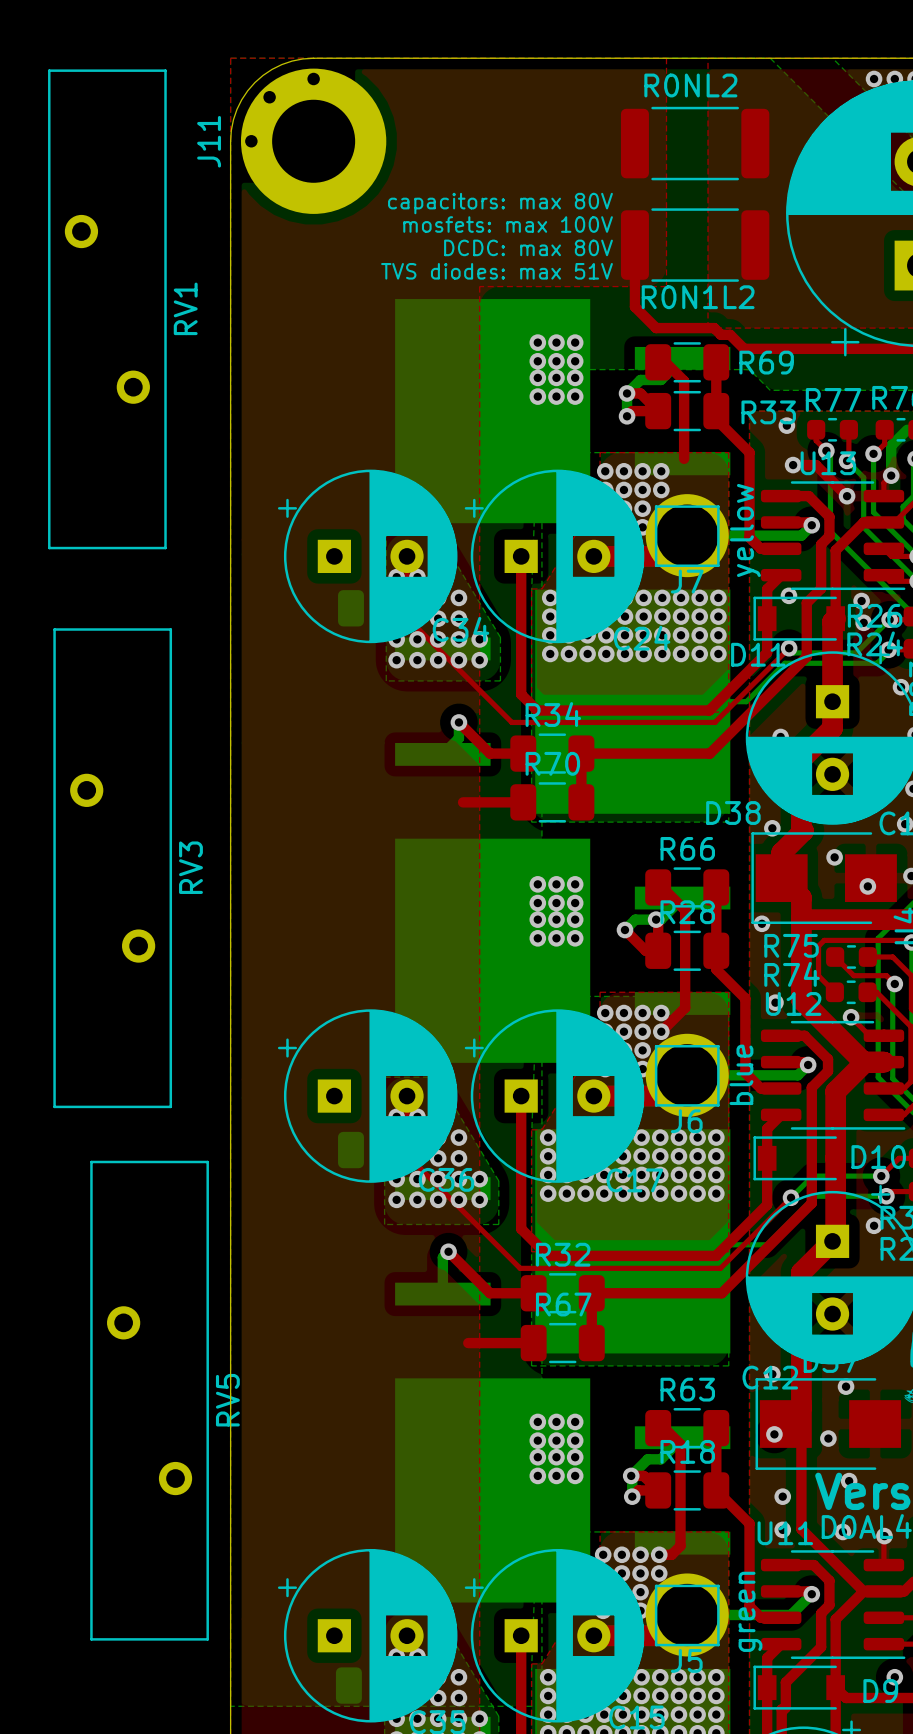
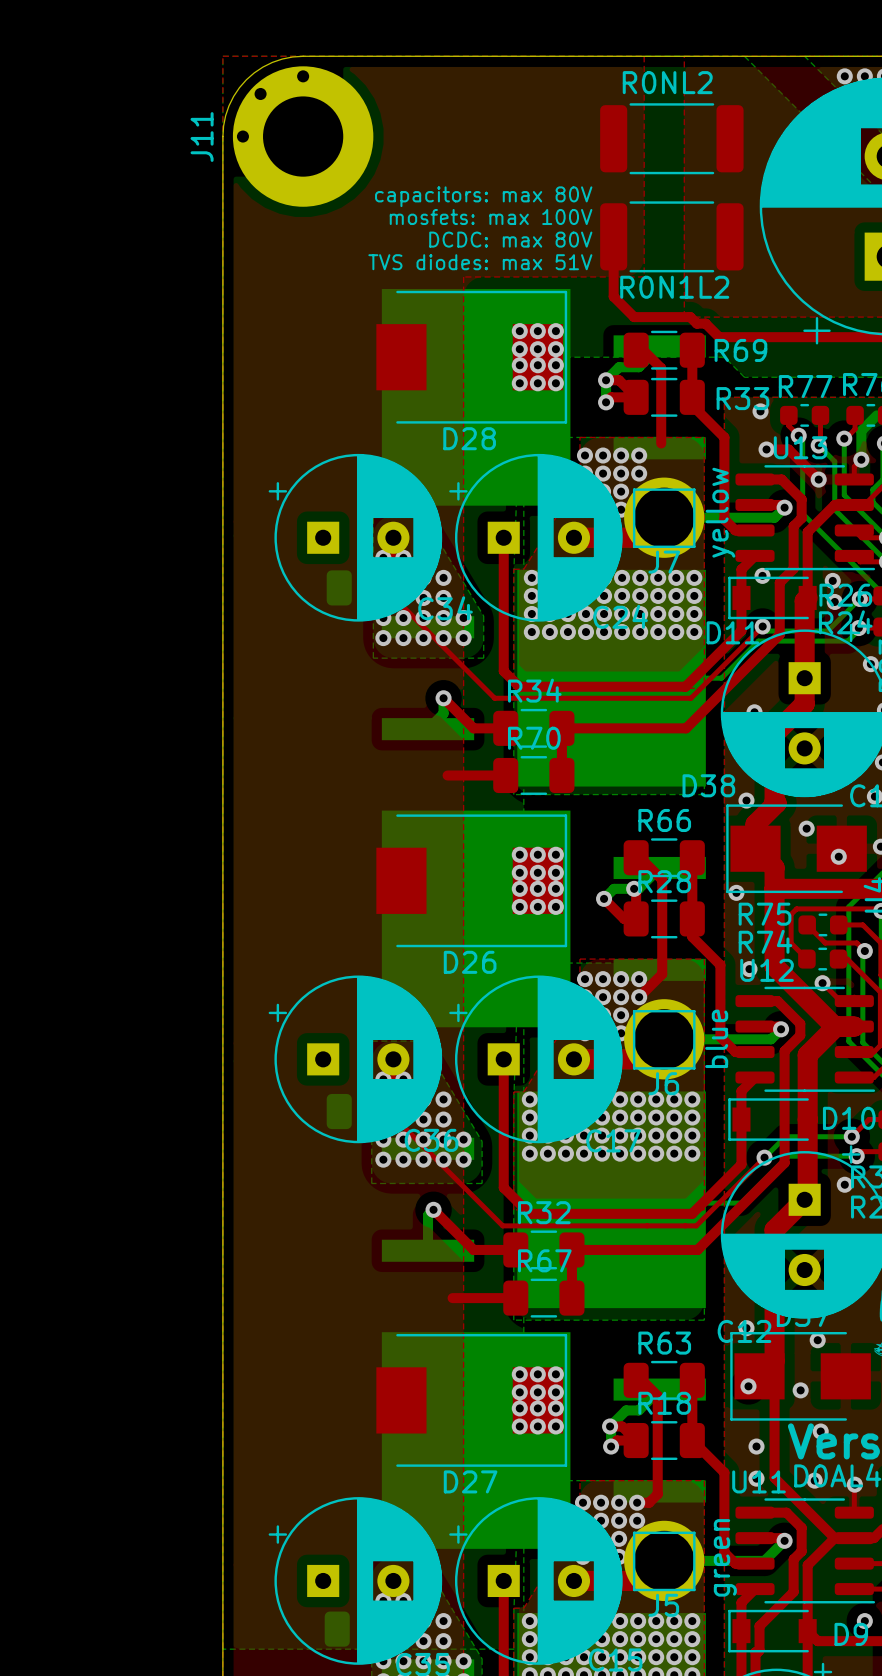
RV1: (107, 309) -> none
D28: none -> (471, 357)
RV3: (112, 868) -> none
D26: none -> (471, 880)
RV5: (149, 1400) -> none
D27: none -> (471, 1400)

